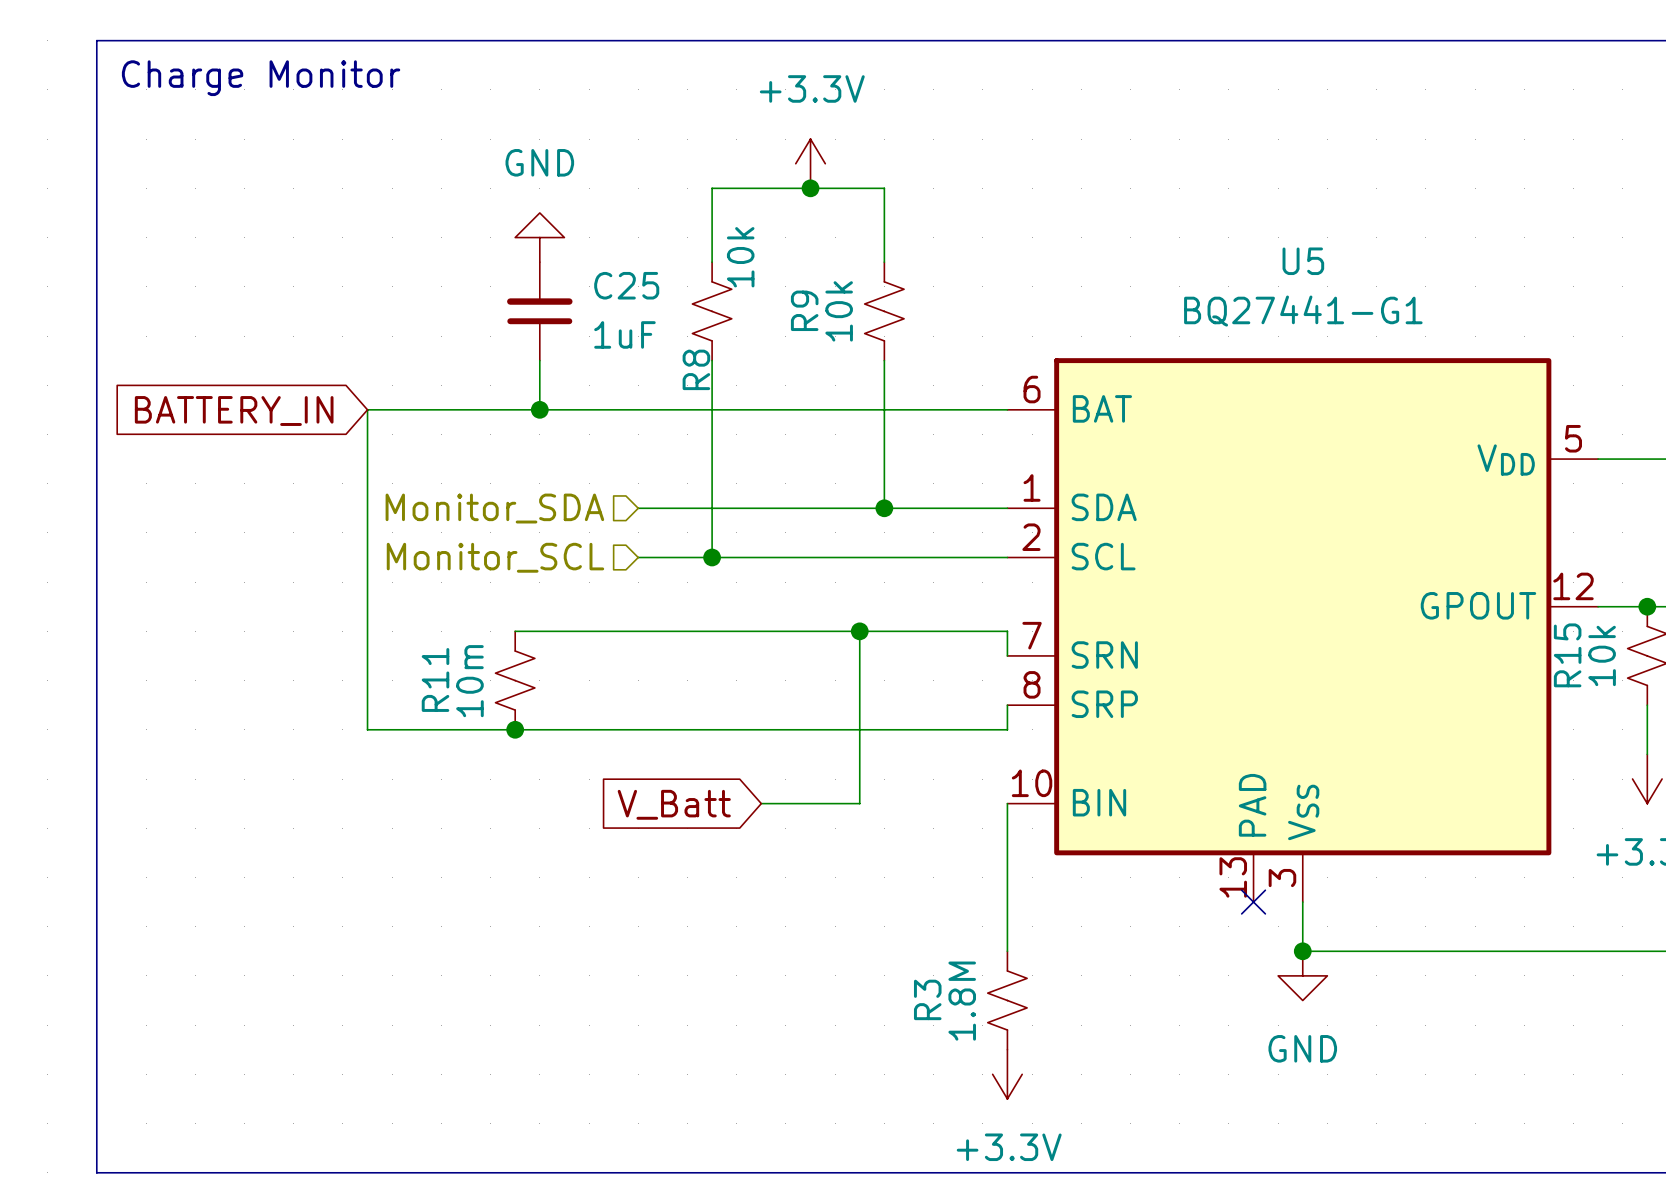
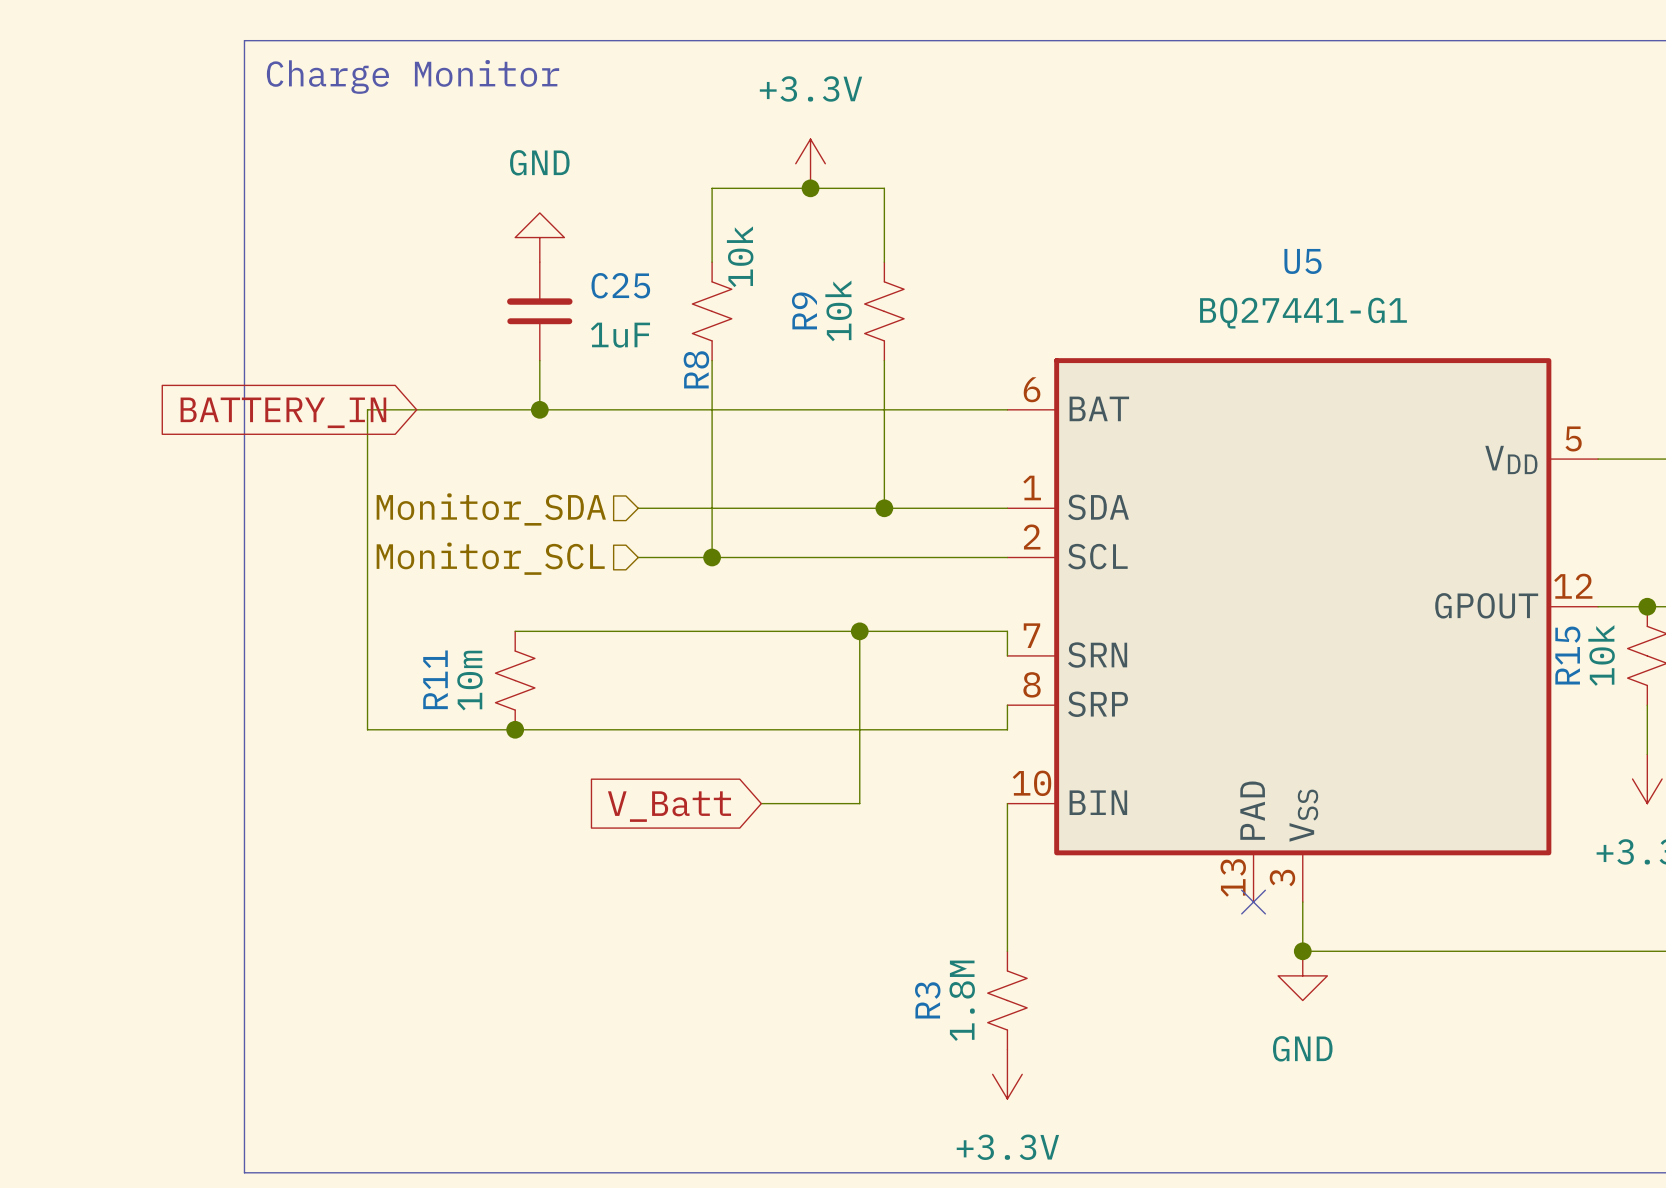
line: (244, 40) (96, 40) (96, 1172) (244, 1172) -> (244, 40) (244, 1172)
text position: Charge Monitor (261, 78) -> Charge Monitor (413, 76)
global label position: BATTERY_IN (234, 411) -> BATTERY_IN (283, 412)

